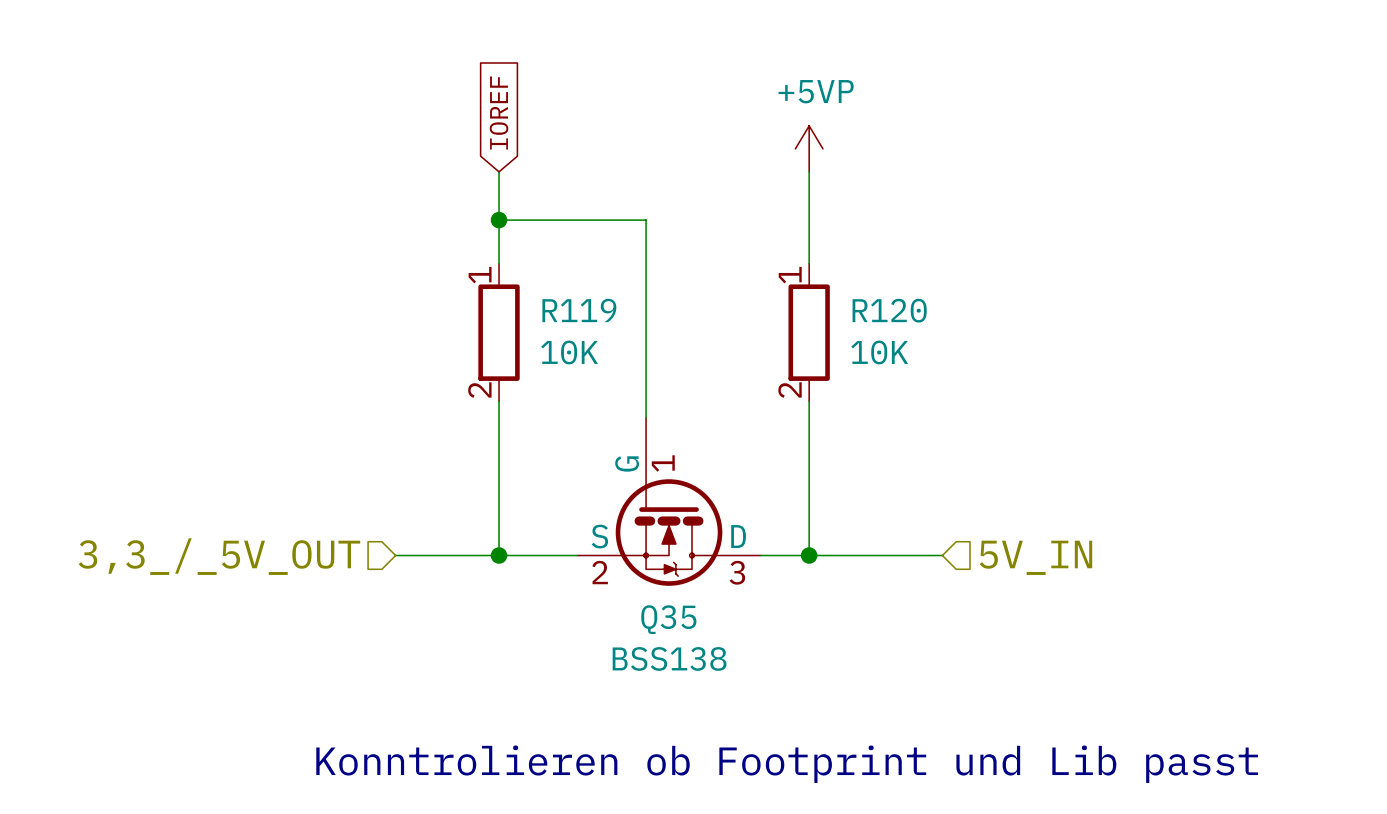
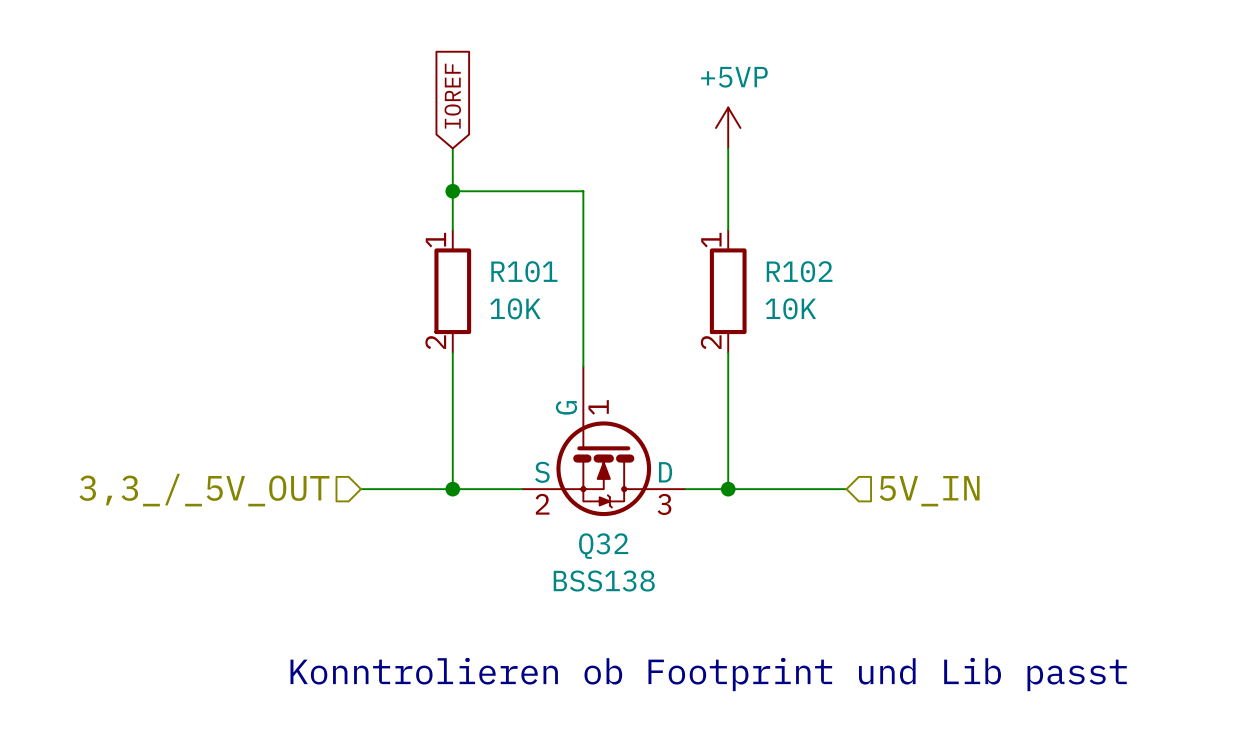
R119 name: R119 (579, 310) -> R101 (524, 271)
R120 name: R120 (889, 310) -> R102 (799, 271)
Q35 name: Q35 (668, 619) -> Q32 (603, 546)

